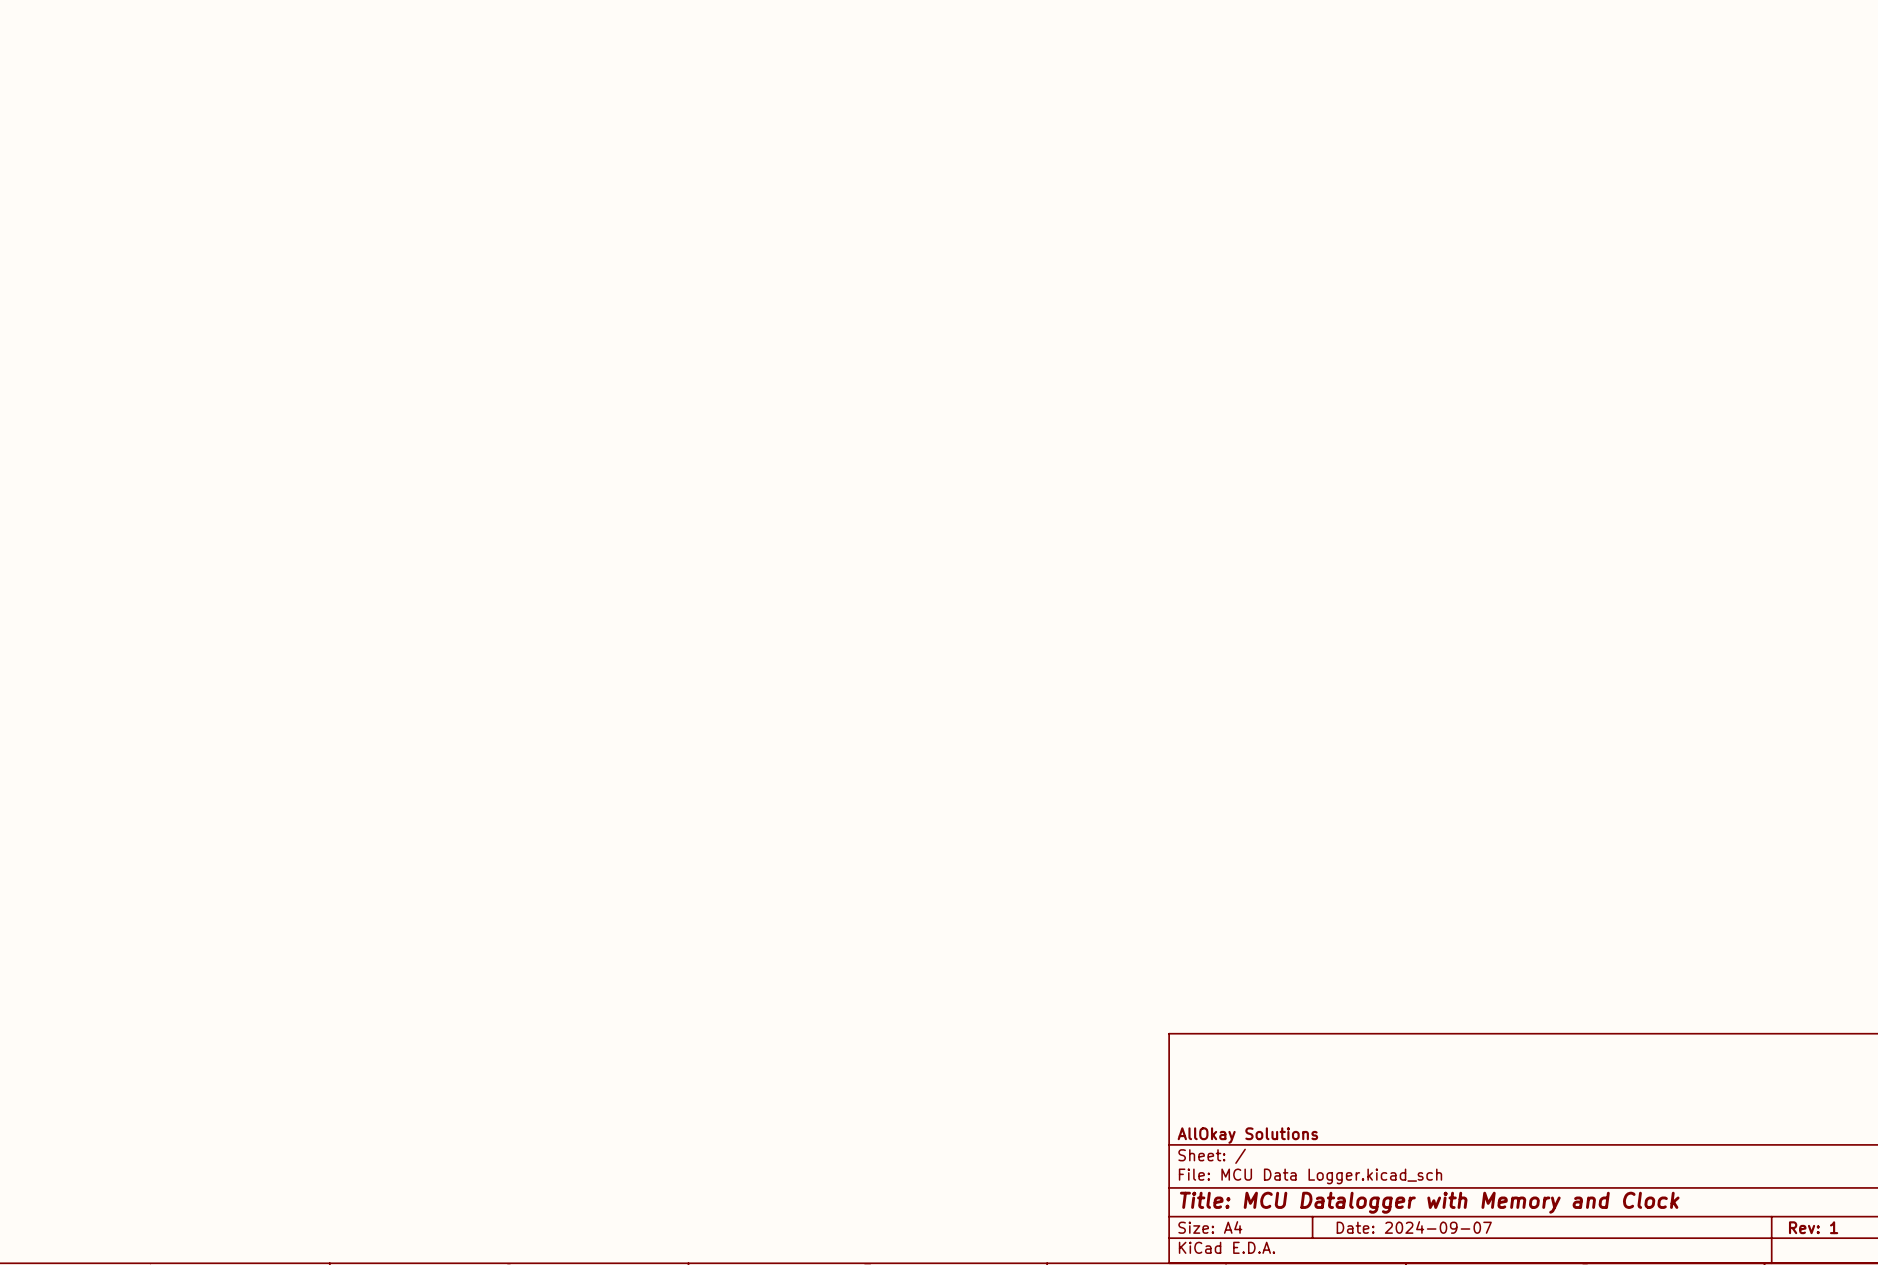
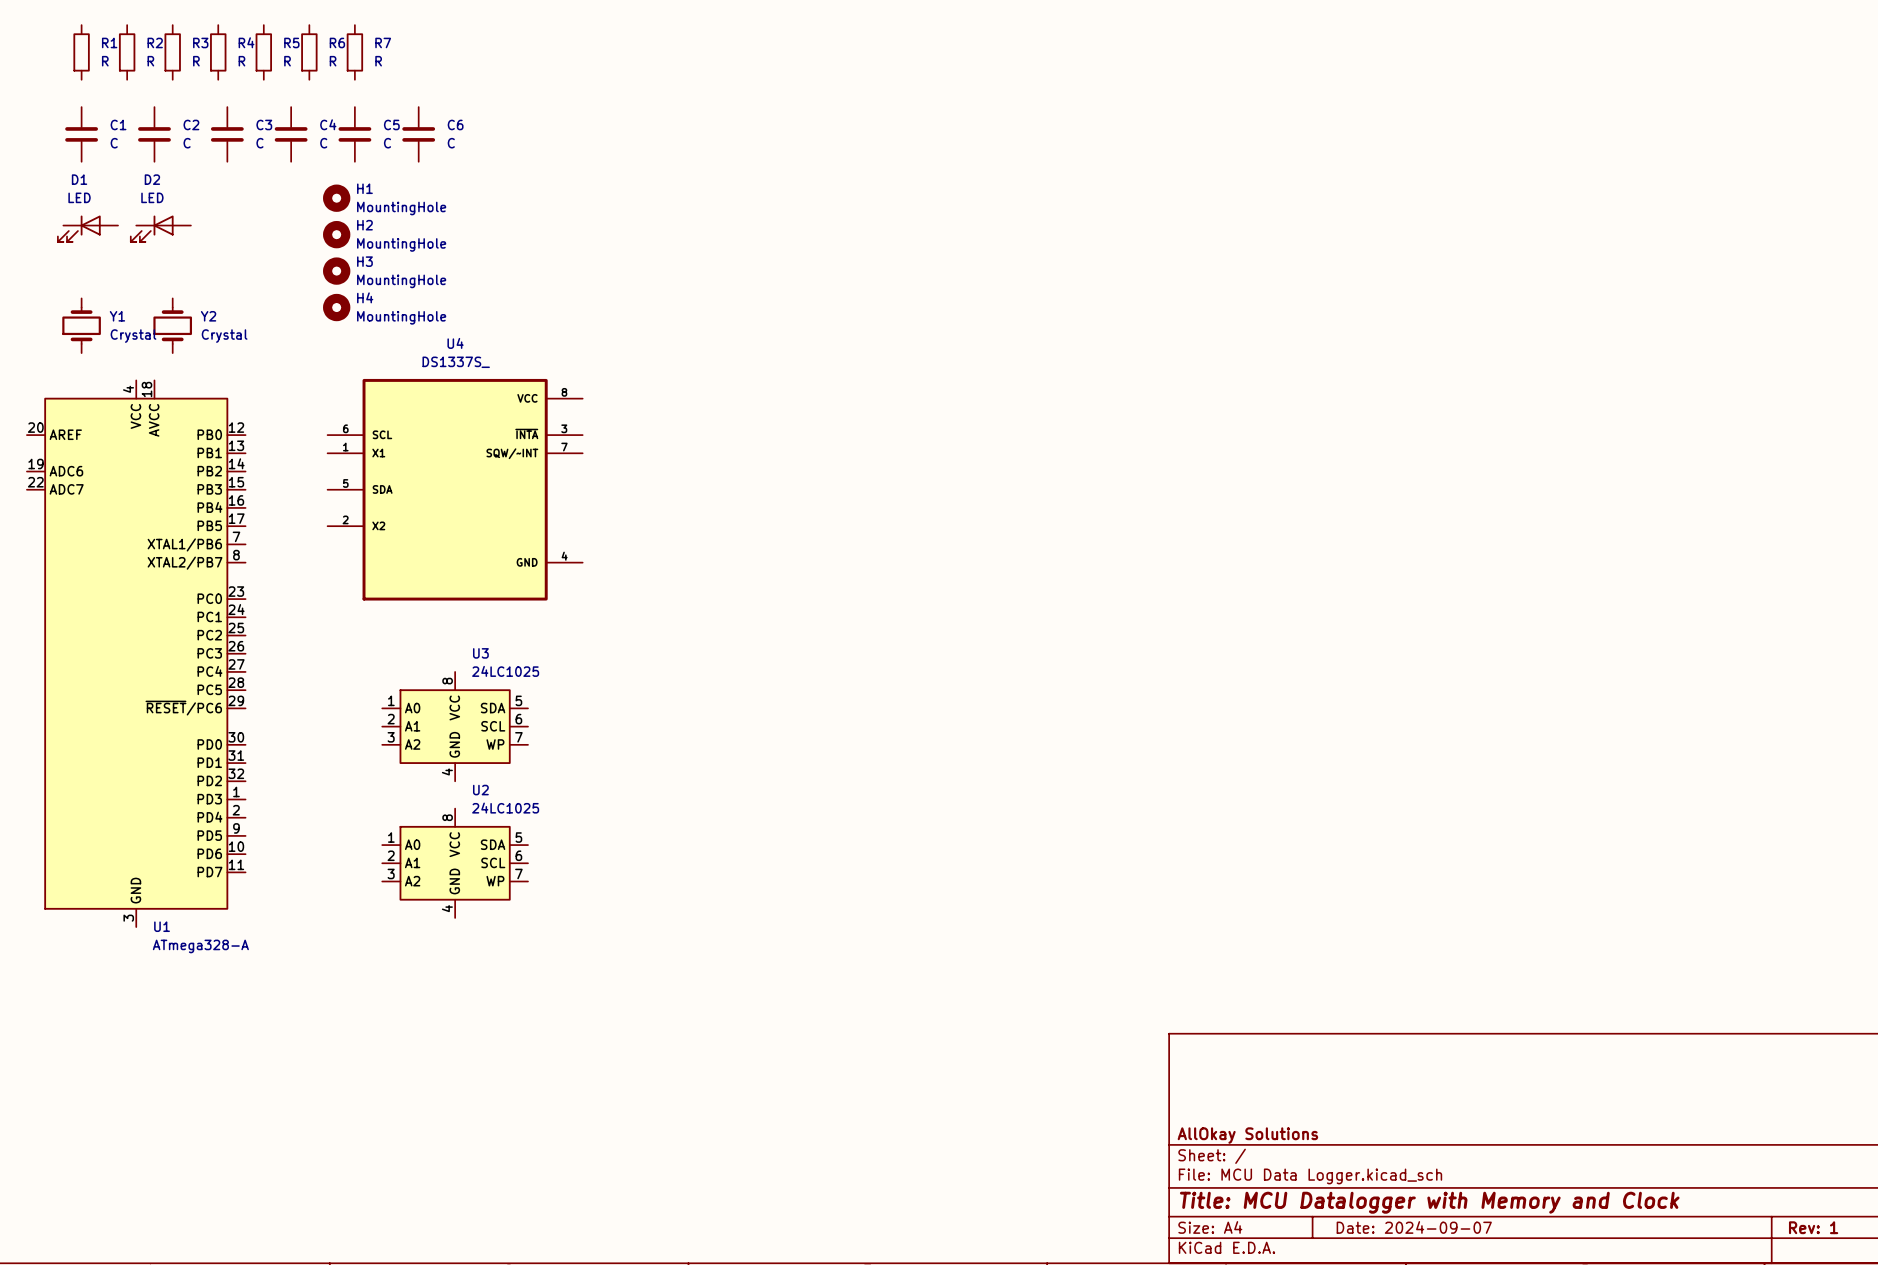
R1: none -> R (81, 52)
R2: none -> R (127, 52)
R3: none -> R (172, 52)
R4: none -> R (218, 52)
R5: none -> R (263, 52)
R6: none -> R (309, 52)
R7: none -> R (354, 52)
C1: none -> C (81, 134)
C2: none -> C (154, 134)
C3: none -> C (227, 134)
C4: none -> C (291, 134)
C5: none -> C (354, 134)
C6: none -> C (418, 134)
H1: none -> MountingHole (336, 198)
D1: none -> LED (87, 228)
D2: none -> LED (160, 228)
H2: none -> MountingHole (336, 234)
H3: none -> MountingHole (336, 271)
H4: none -> MountingHole (336, 307)
Y1: none -> Crystal (81, 325)
Y2: none -> Crystal (172, 325)
U4: none -> DS1337S_ (455, 489)
U1: none -> ATmega328-A (136, 653)
U3: none -> 24LC1025 (455, 726)
U2: none -> 24LC1025 (455, 863)

